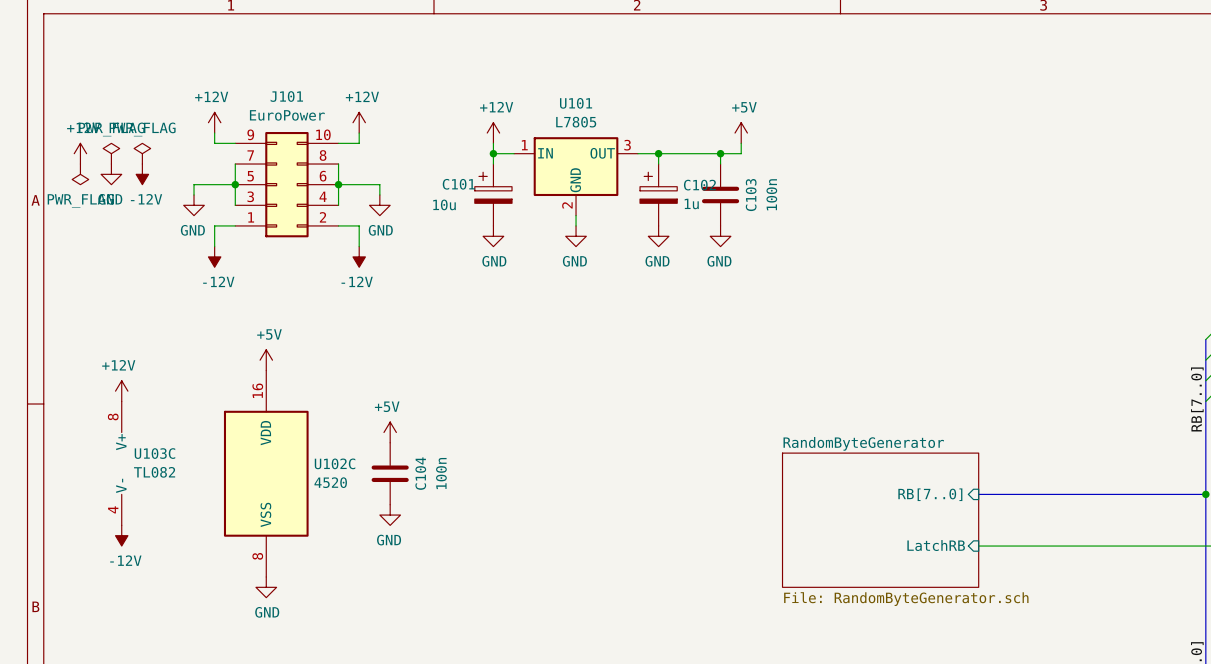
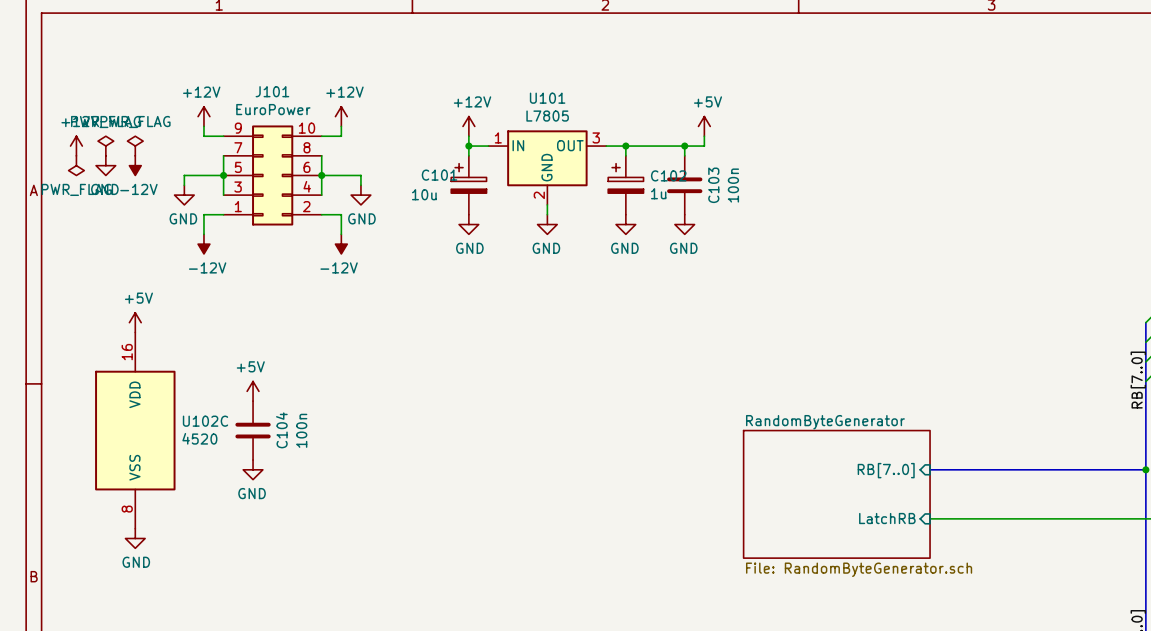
power symbol text position: +5V (269, 334) -> +5V (250, 366)
power symbol: none -> +5V (135, 322)
power symbol position: +5V (266, 360) -> +5V (253, 391)
power symbol: +12V (121, 391) -> none
power symbol: +5V (390, 432) -> none
U103C: TL082 (121, 463) -> none
U102C position: (266, 473) -> (135, 430)
C104 position: (390, 473) -> (253, 430)
power symbol: none -> GND (253, 469)
power symbol: GND (390, 515) -> none
power symbol: -12V (121, 535) -> none
power symbol: none -> GND (135, 538)
power symbol: GND (266, 587) -> none

